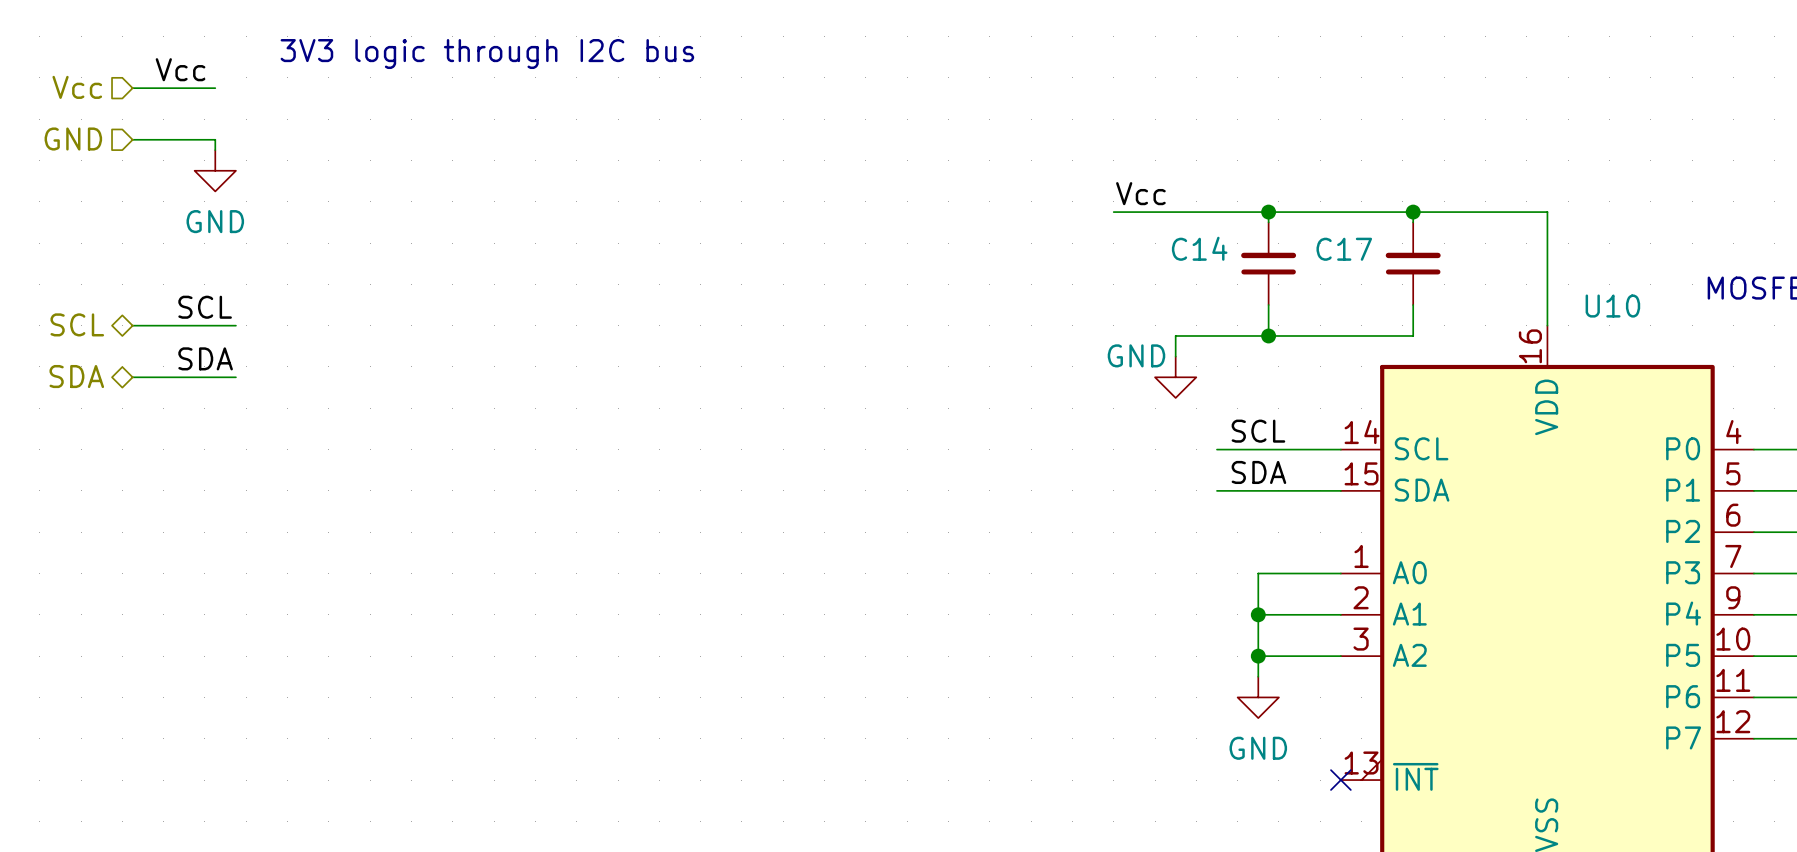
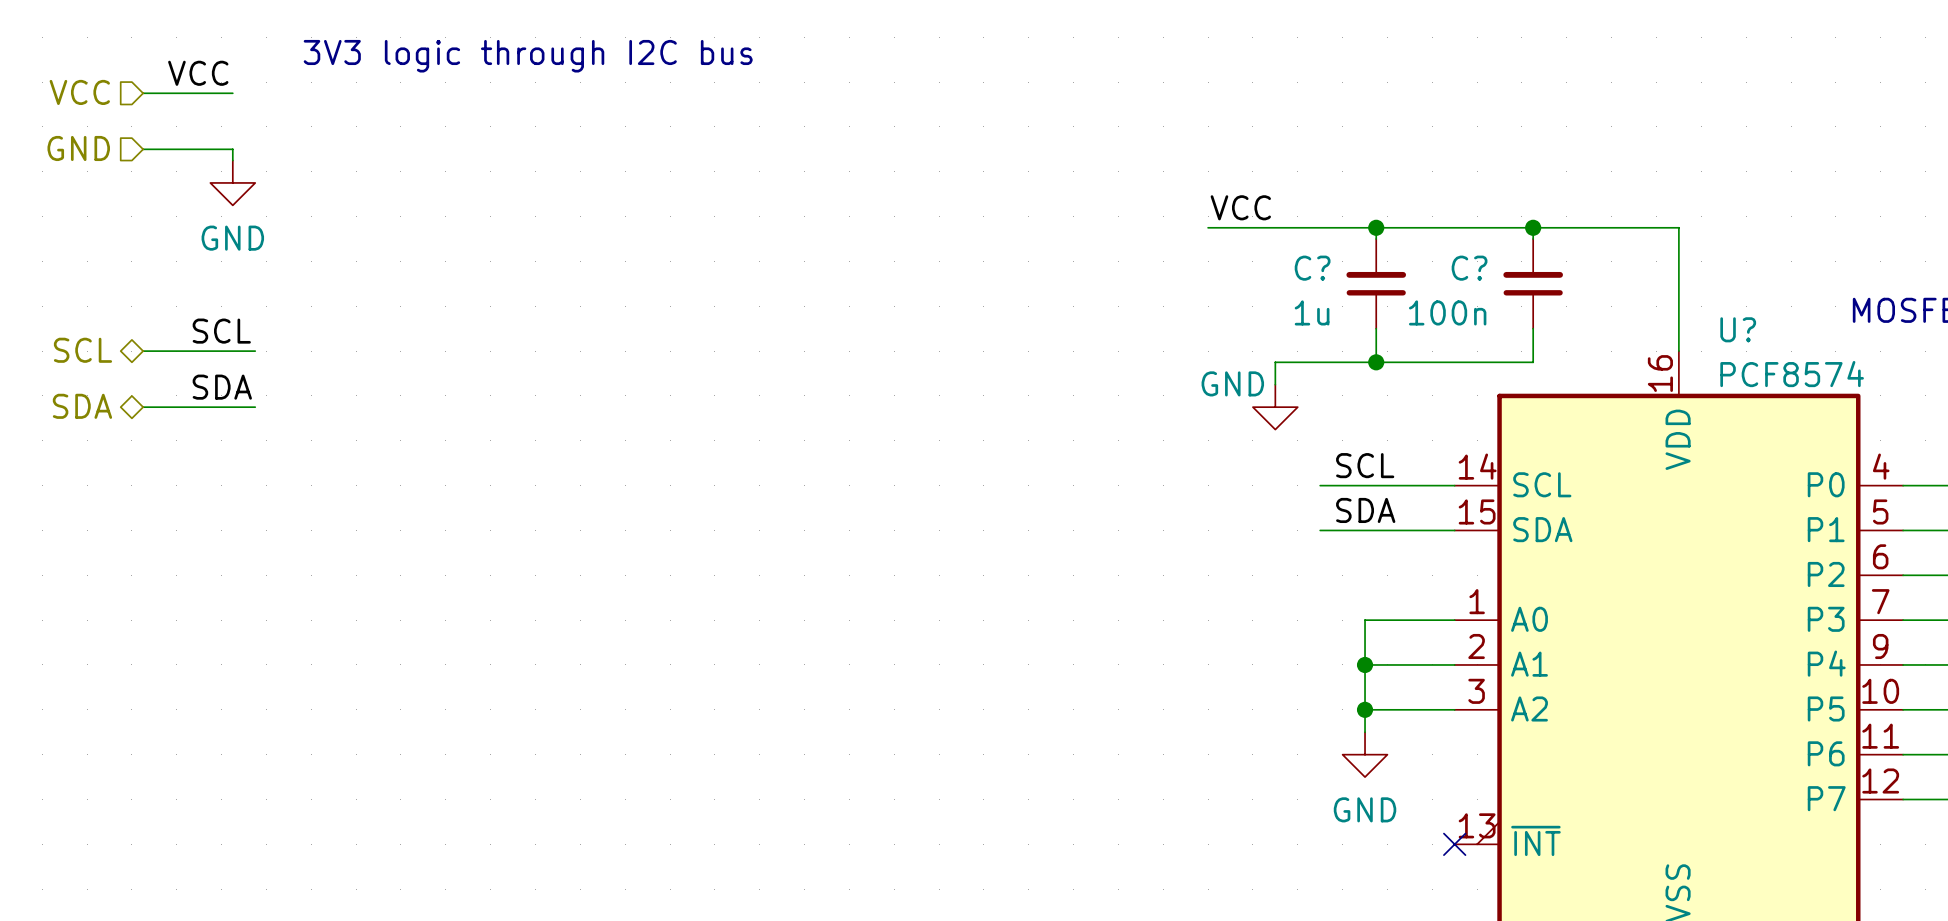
label: Vcc (180, 69) -> VCC (198, 73)
hierarchical label: Vcc (77, 87) -> VCC (79, 92)
label: Vcc (1140, 193) -> VCC (1240, 207)
C14 name: C14 (1199, 248) -> C? (1312, 268)
C17 name: C17 (1344, 249) -> C? (1469, 268)
C14 value: none -> 1u (1312, 312)
C17 value: none -> 100n (1447, 312)
U10 name: U10 (1612, 306) -> U? (1738, 329)
U10 value: none -> PCF8574 (1792, 374)

